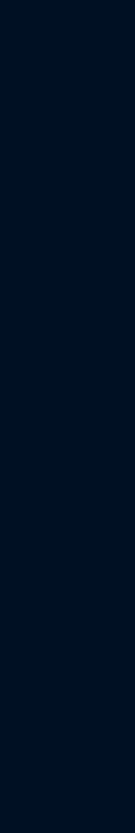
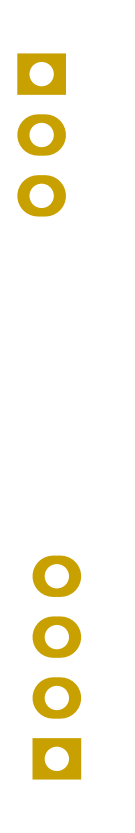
part: none -> (41, 134)
part: none -> (56, 667)

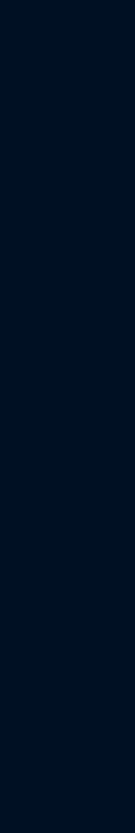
part: (41, 134) -> none
part: (56, 667) -> none

